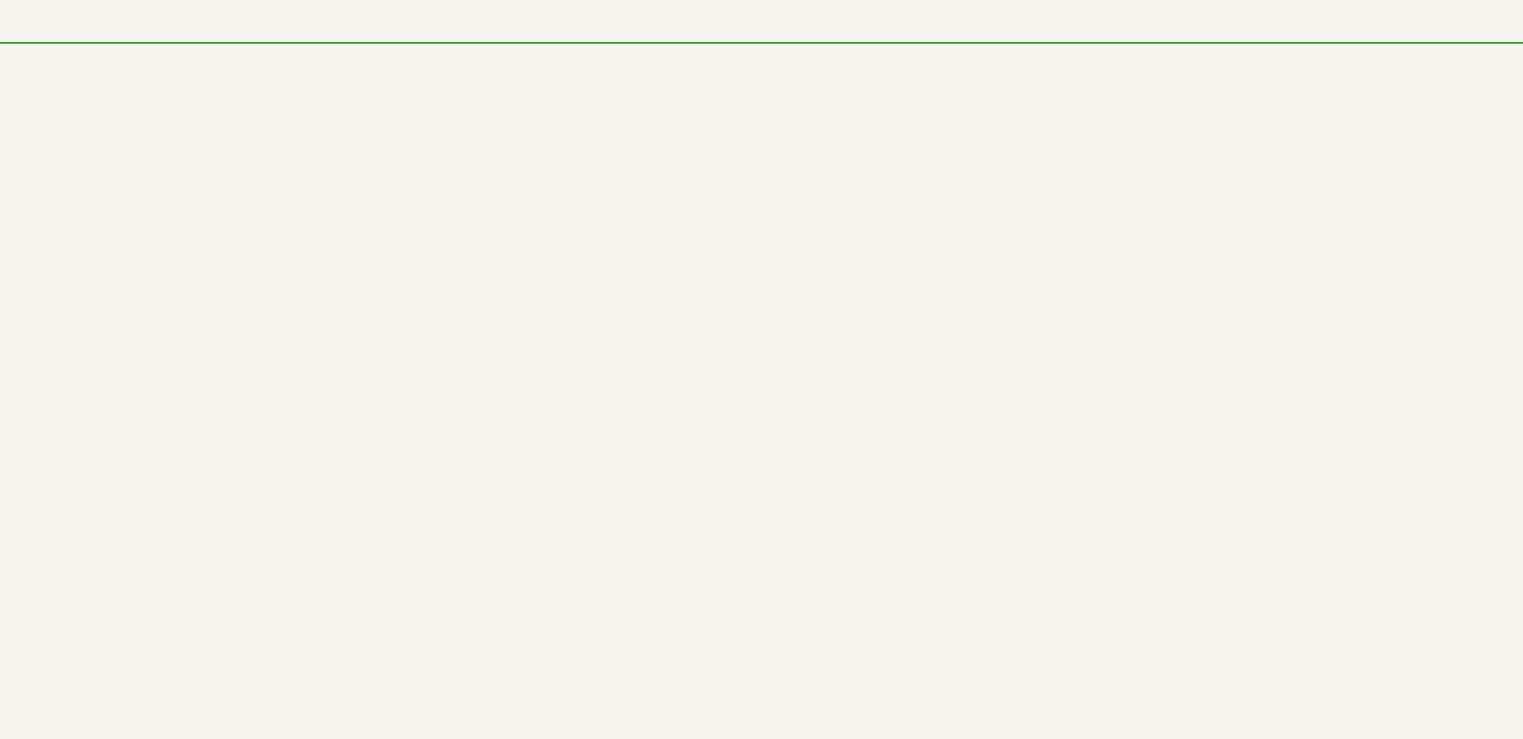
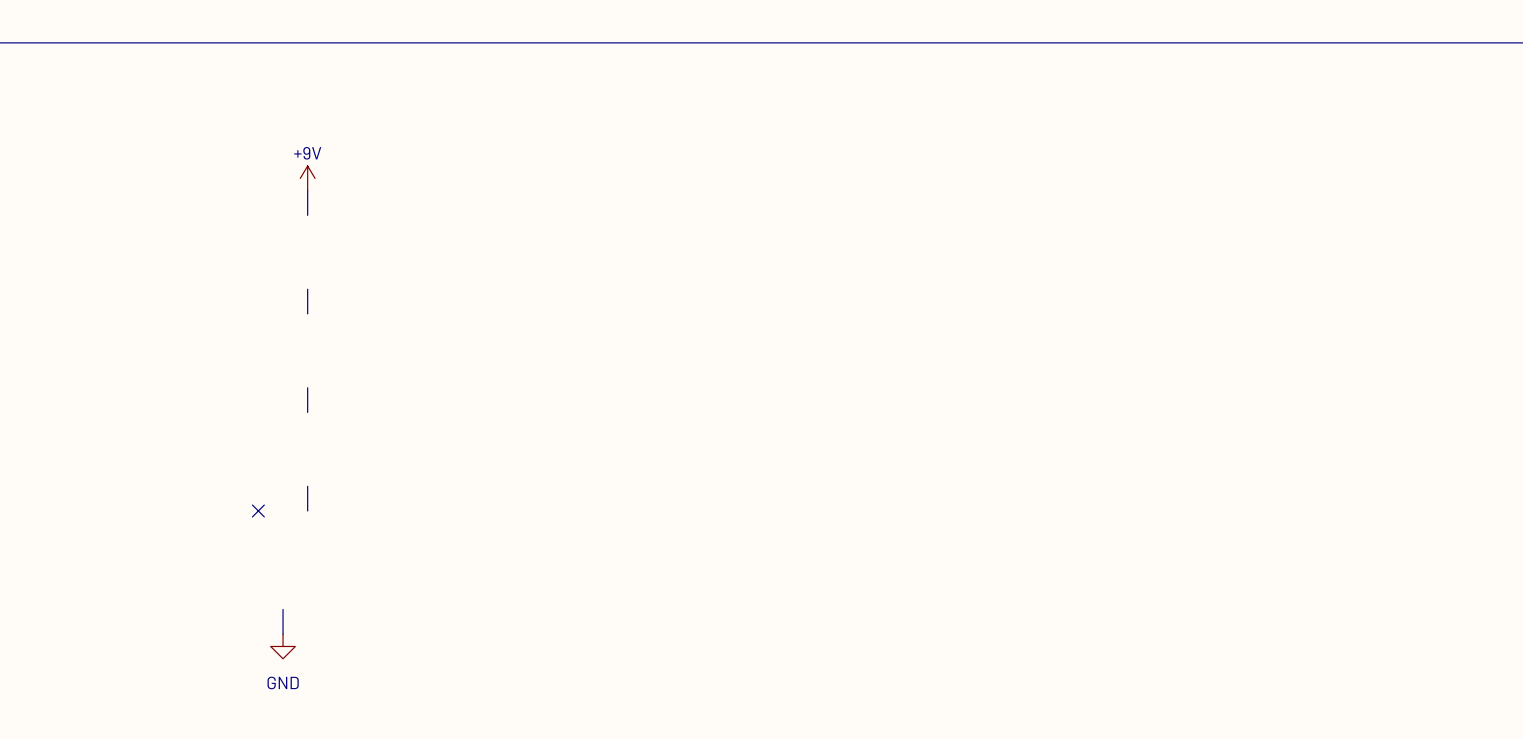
power symbol: none -> +9V (307, 178)
wire: none -> (307, 190) (307, 215)
wire: none -> (307, 289) (307, 313)
wire: none -> (307, 387) (307, 412)
wire: none -> (307, 486) (307, 510)
no-connect mark: none -> (258, 510)
wire: none -> (283, 609) (283, 634)
power symbol: none -> GND (283, 646)

